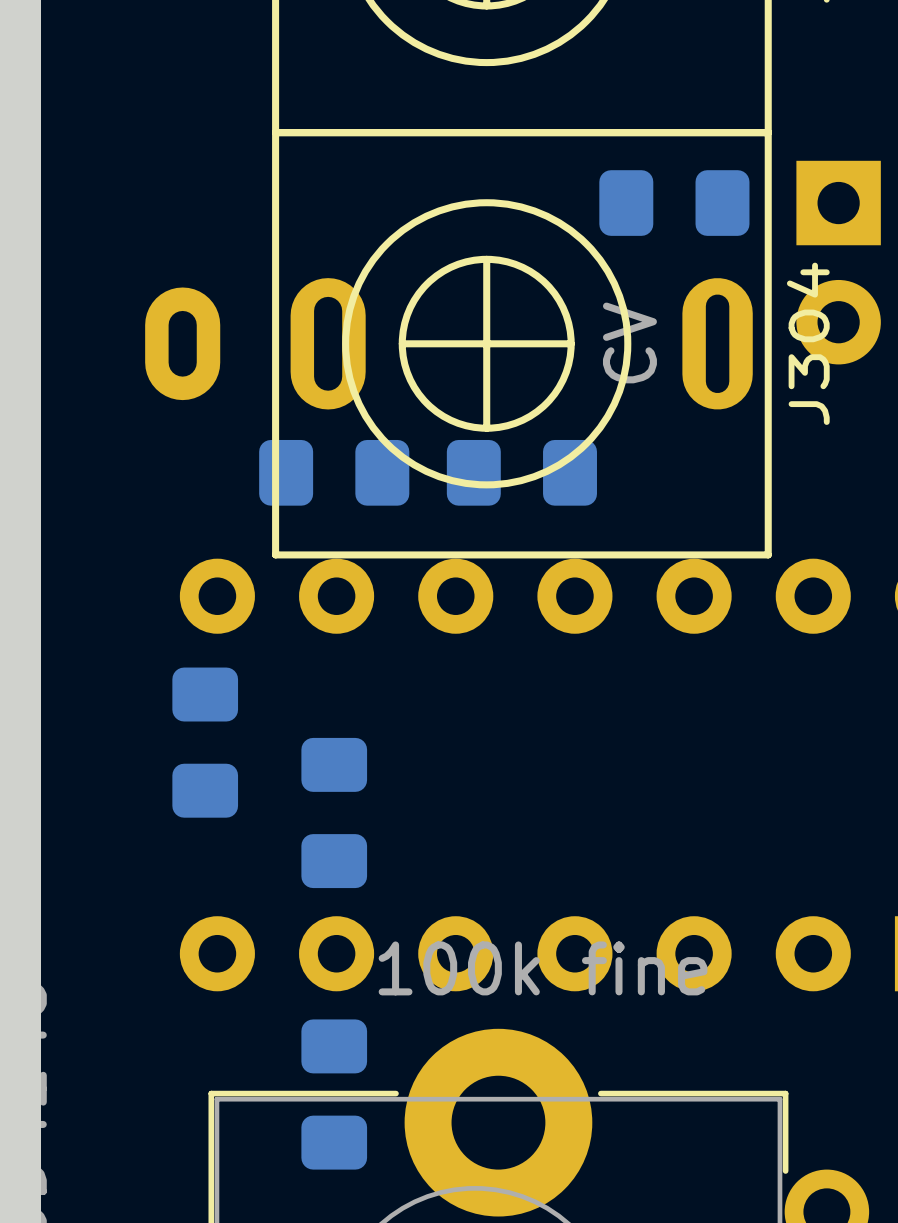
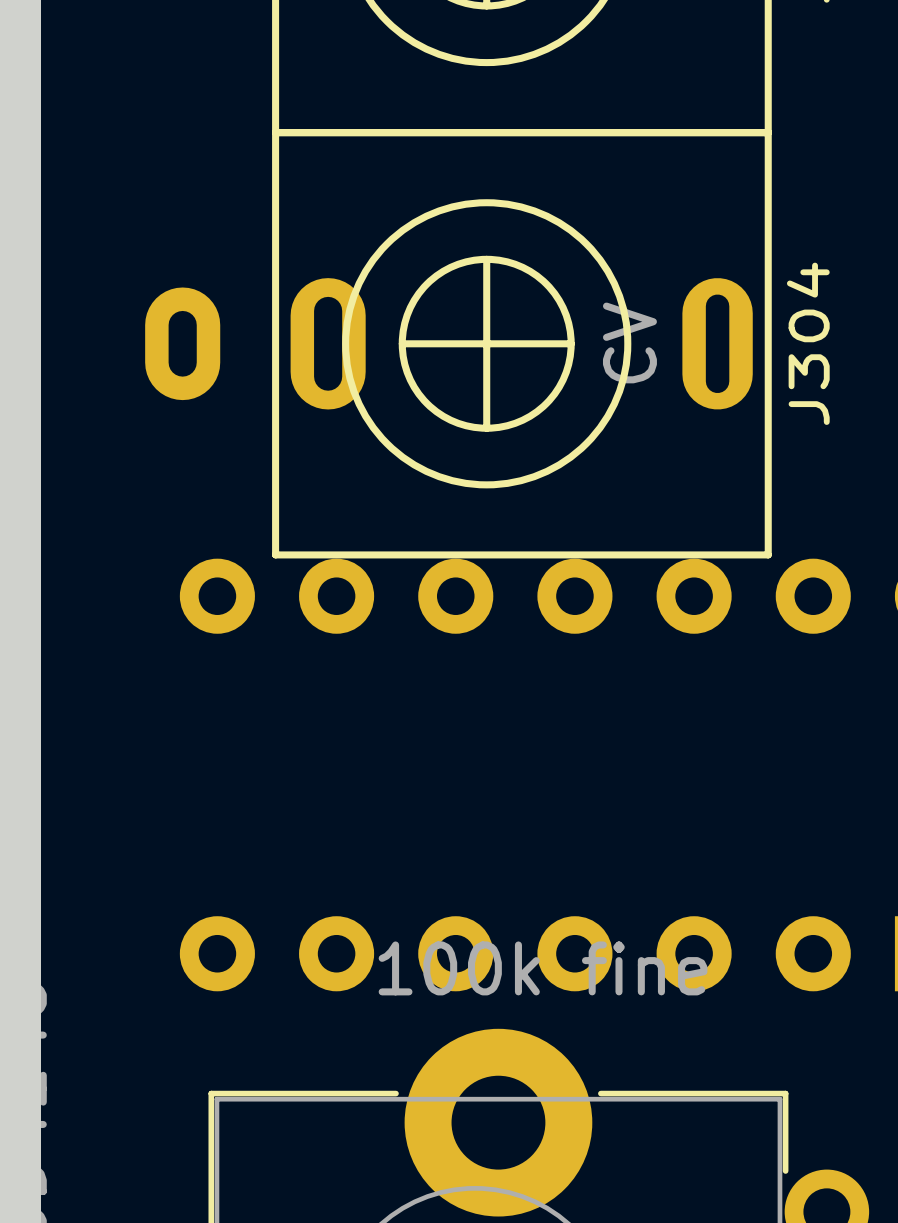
part: (674, 203) -> none
part: (838, 262) -> none
part: (334, 472) -> none
part: (521, 472) -> none
part: (205, 742) -> none
part: (334, 812) -> none
part: (334, 1094) -> none

